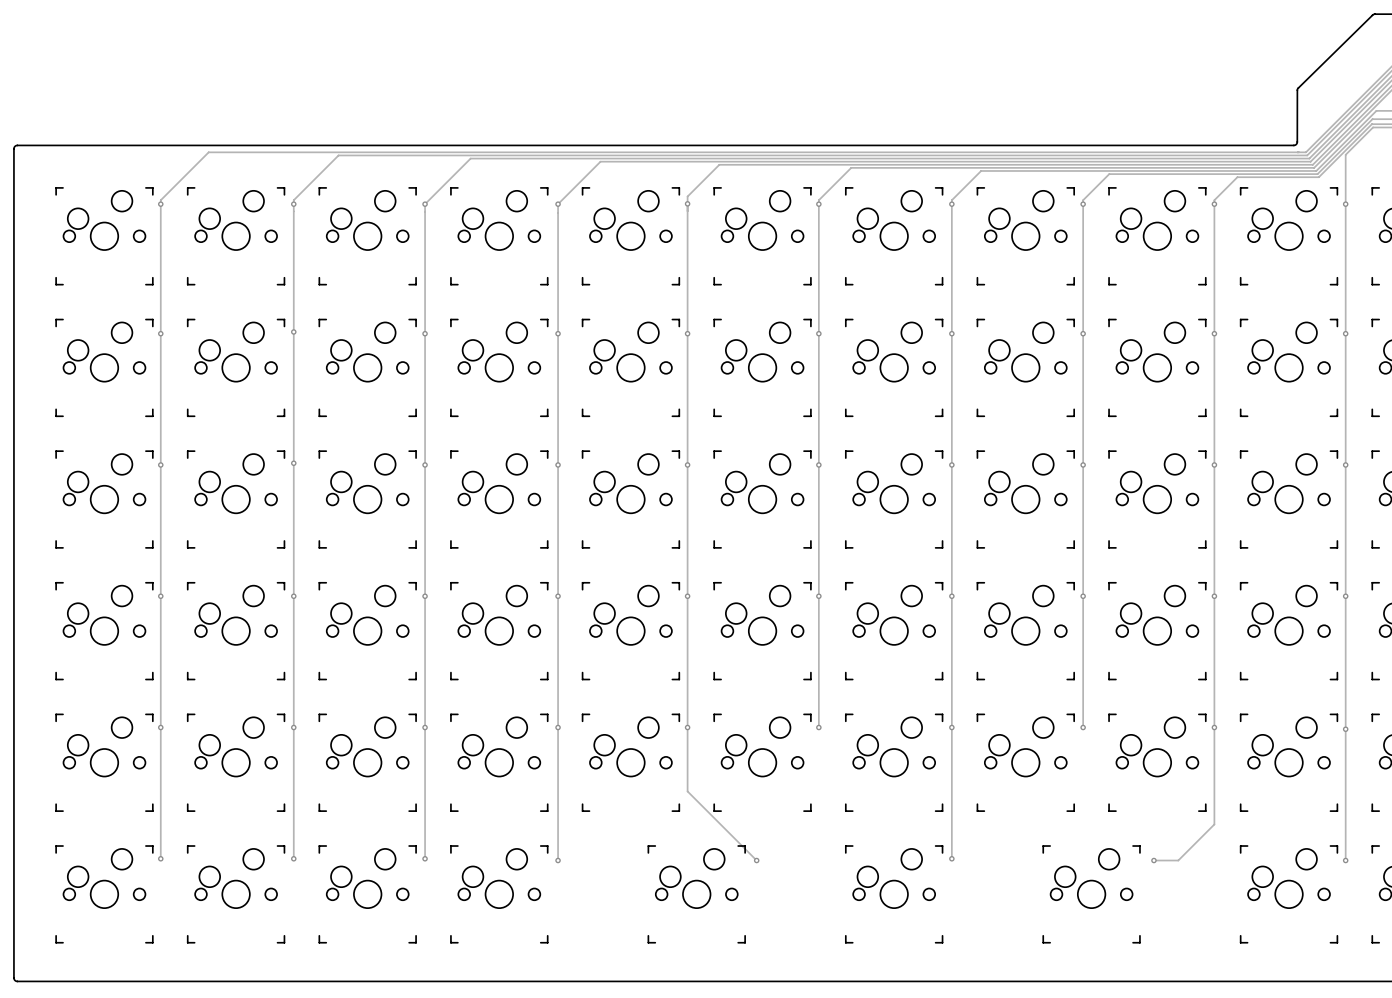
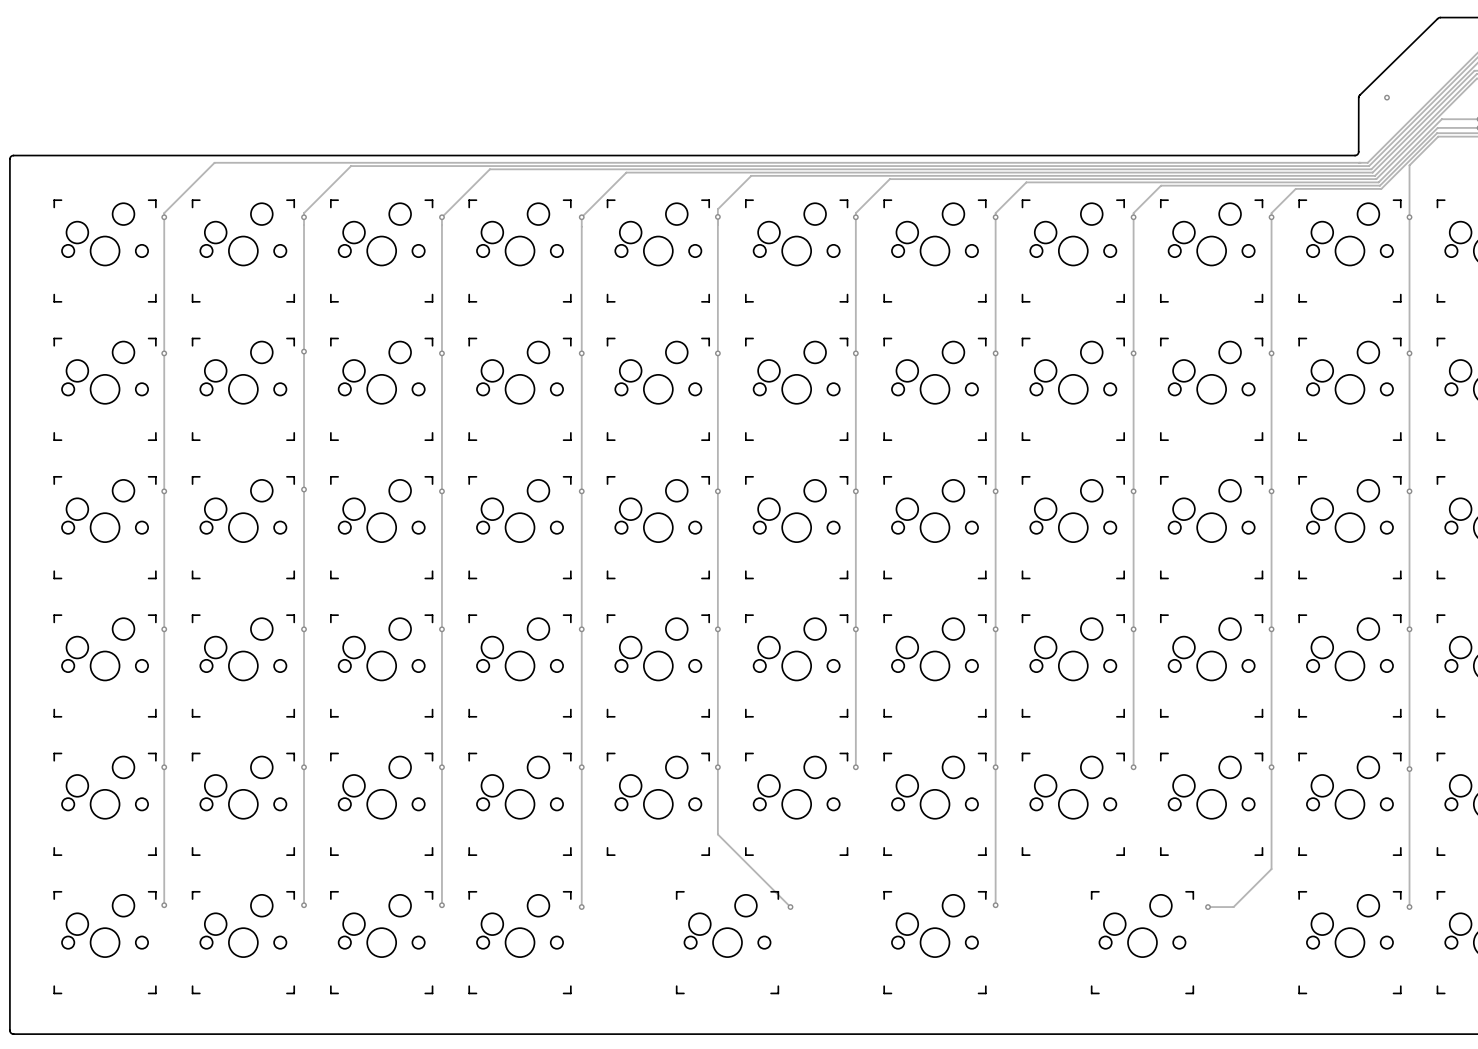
via: none -> (1387, 97)

